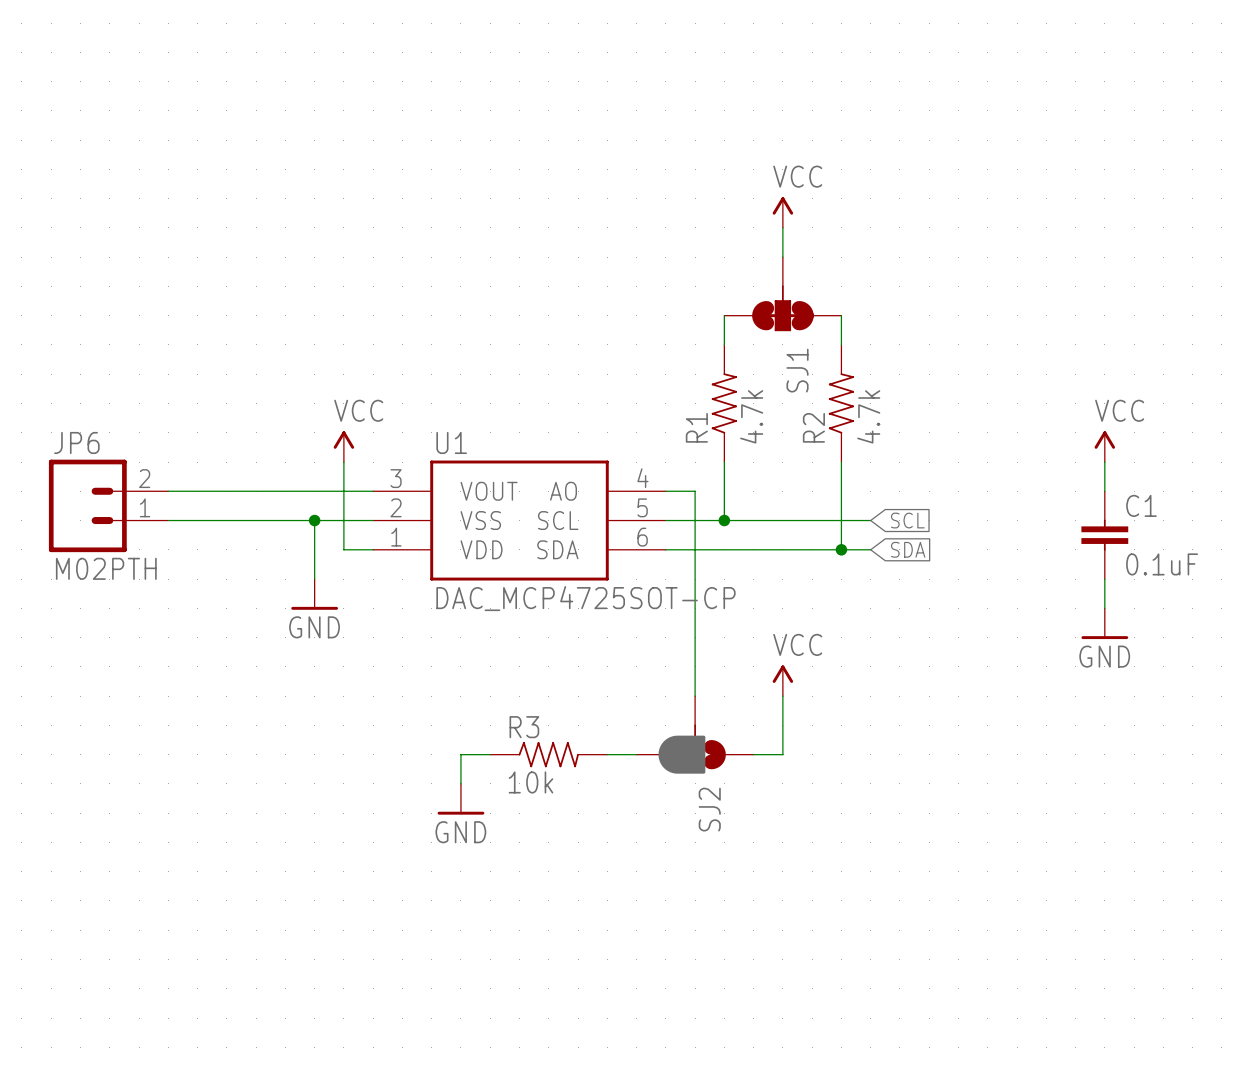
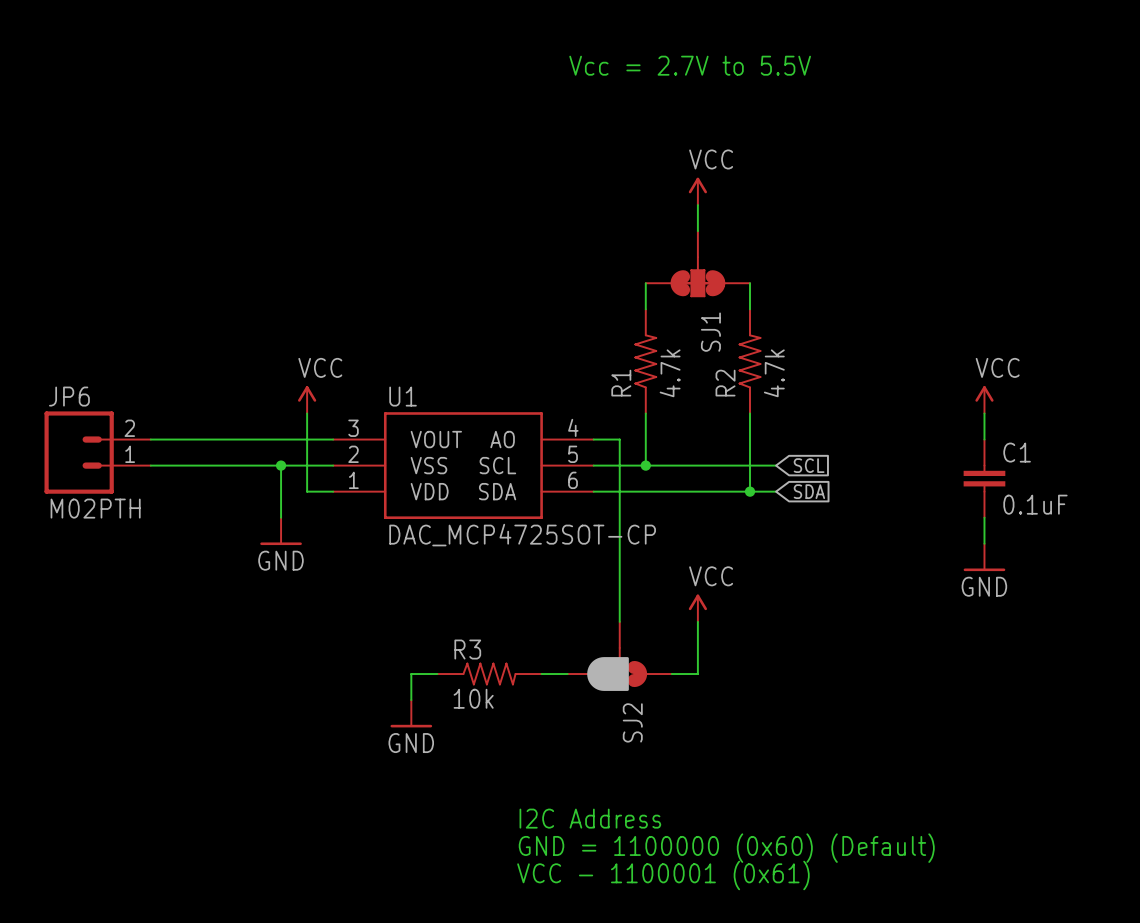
text: none -> Vcc = 2.7V to 5.5V (690, 65)
text: none -> I2C Address (590, 818)
text: none -> GND = 1100000 (0x60) (Default) (726, 848)
text: none -> VCC - 1100001 (0x61) (663, 875)

